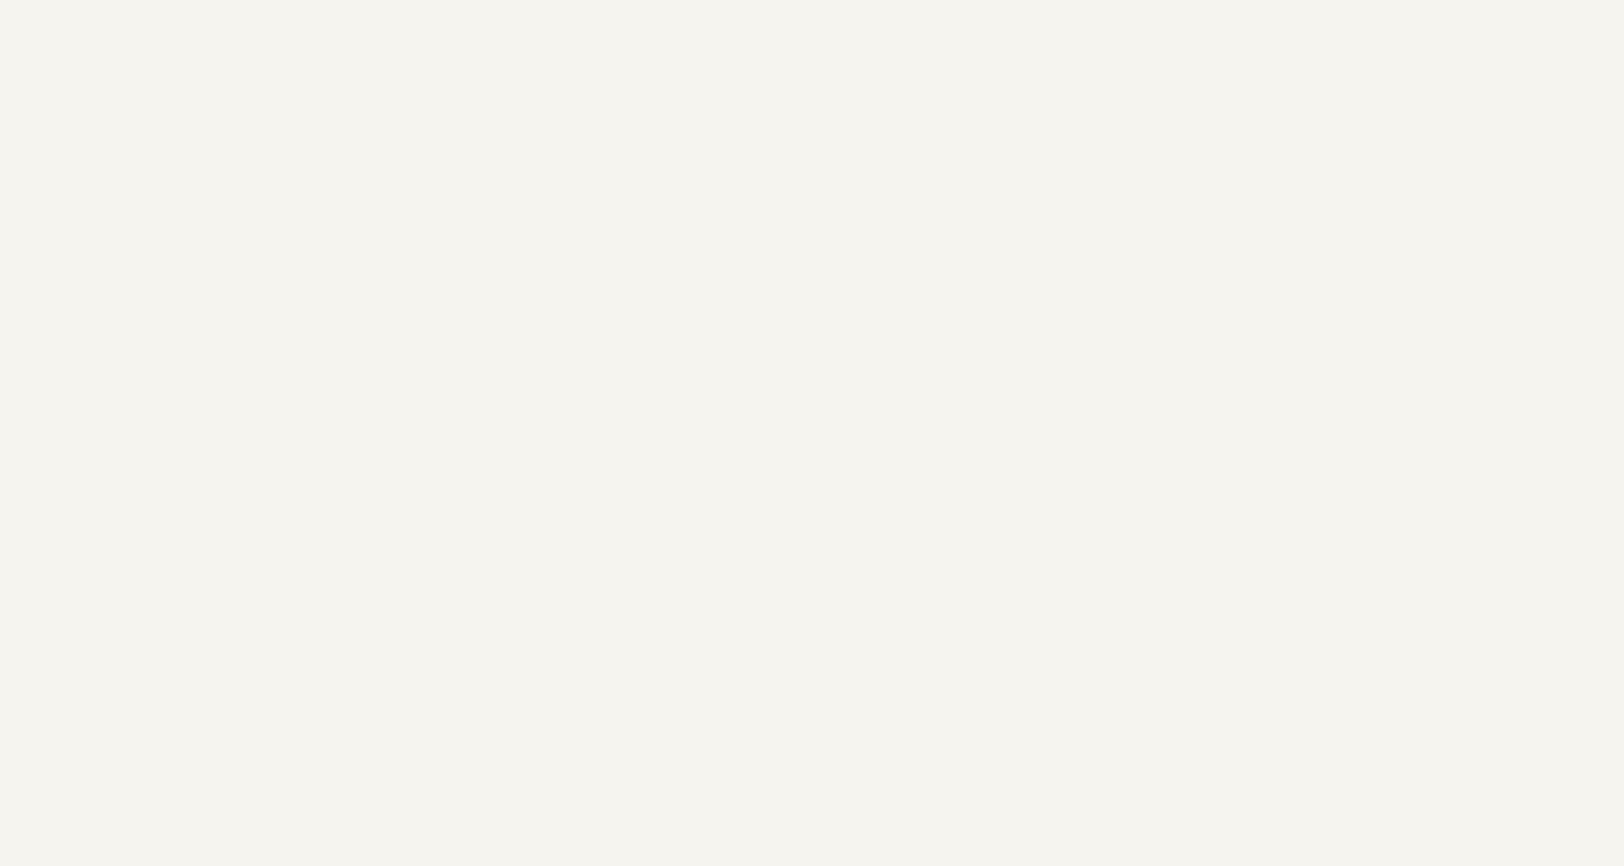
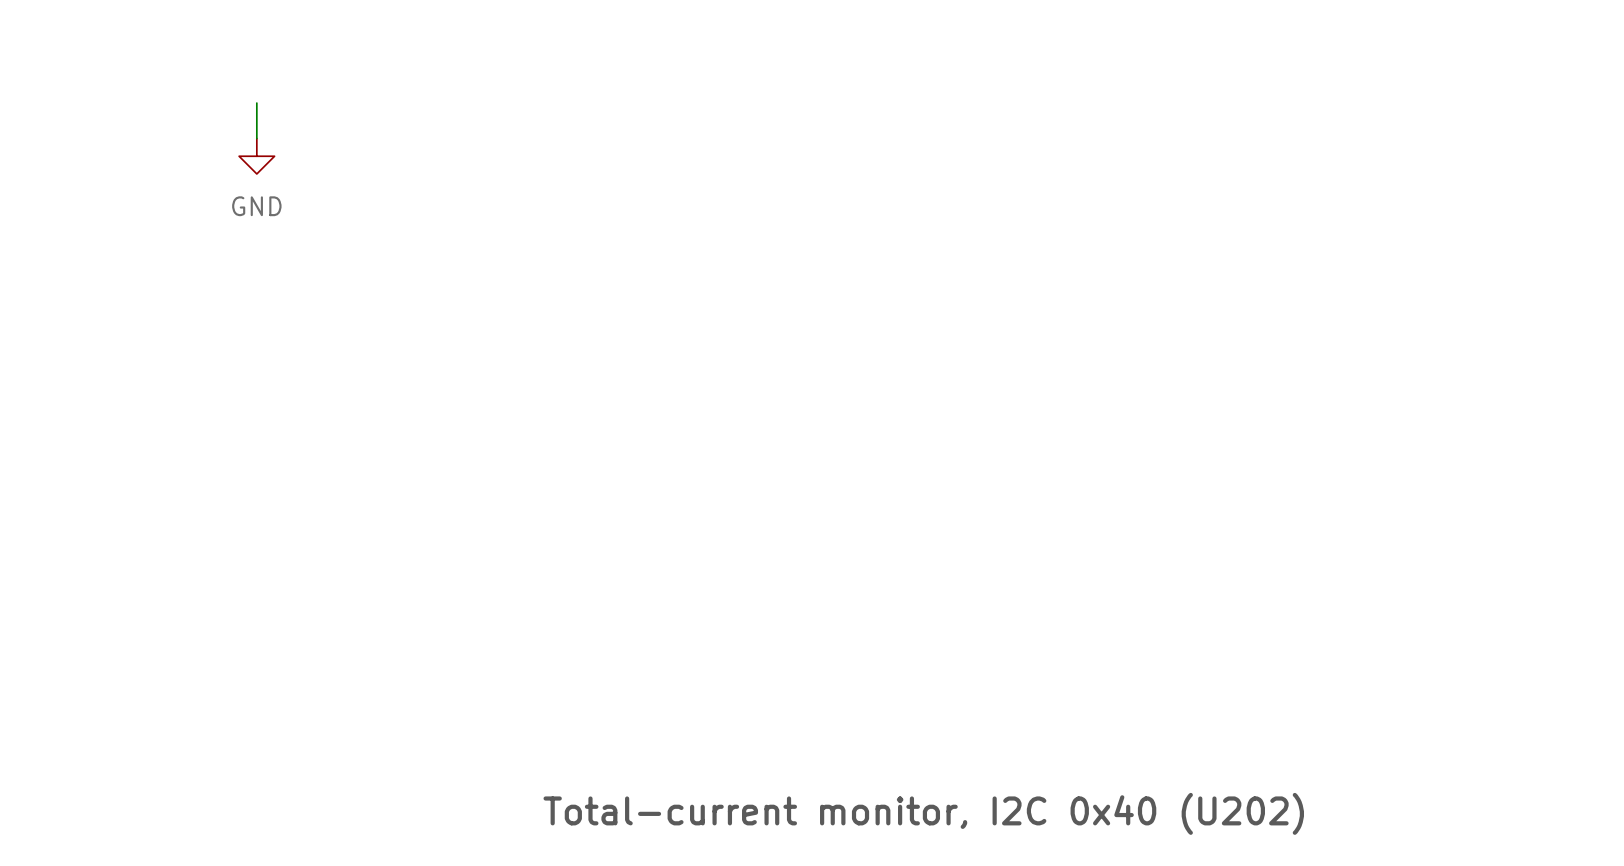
wire: none -> (256, 103) (256, 138)
power symbol: none -> GND (256, 156)
text: none -> Total-current monitor, I2C 0x40 (U202) (923, 813)

